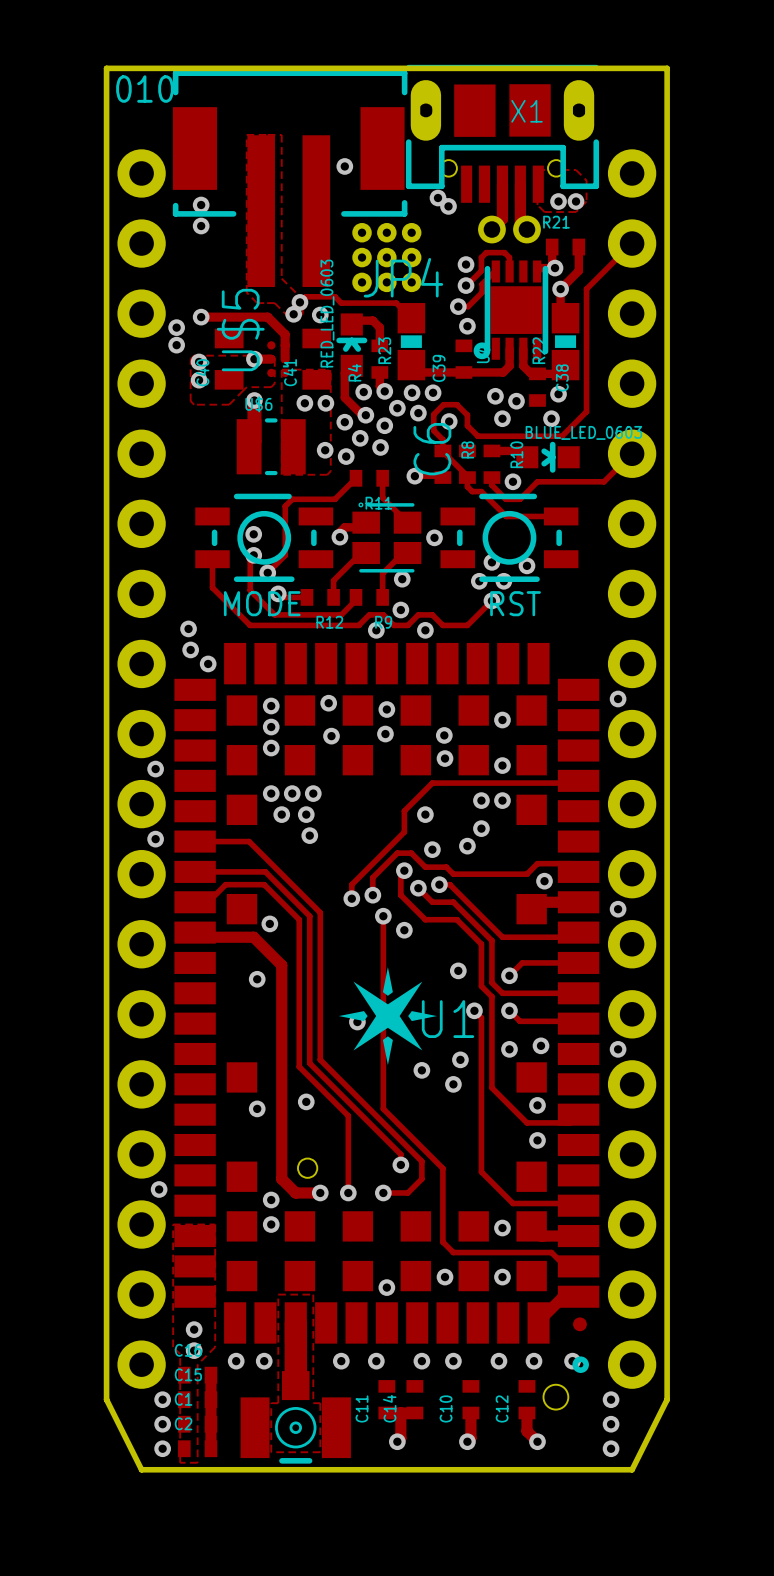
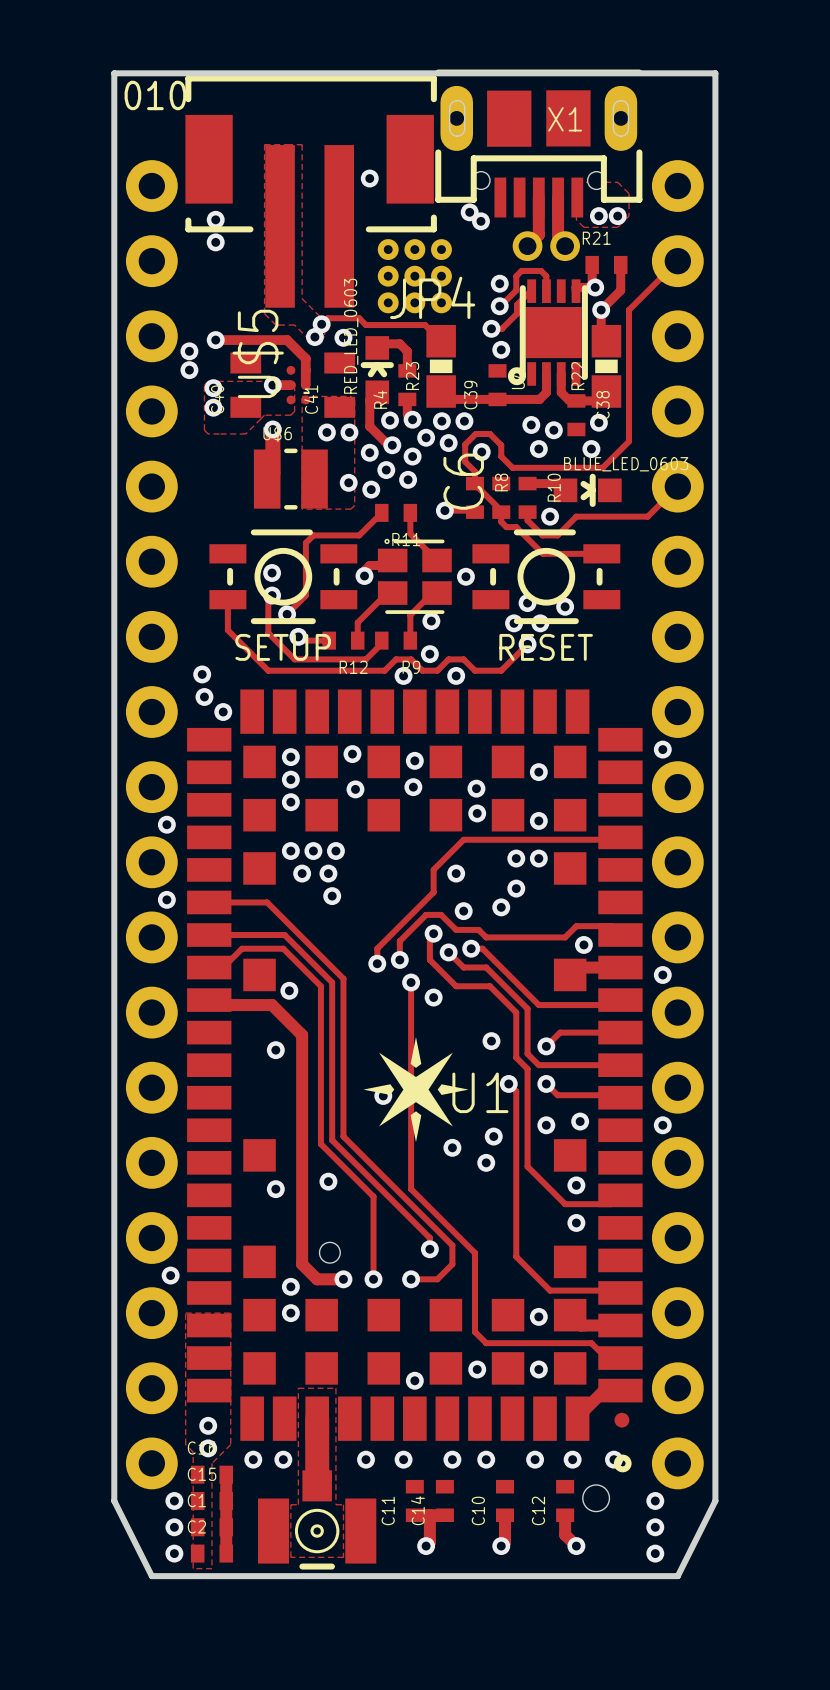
text: MODE (262, 603) -> SETUP (283, 647)
text: RST (515, 603) -> RESET (546, 647)

